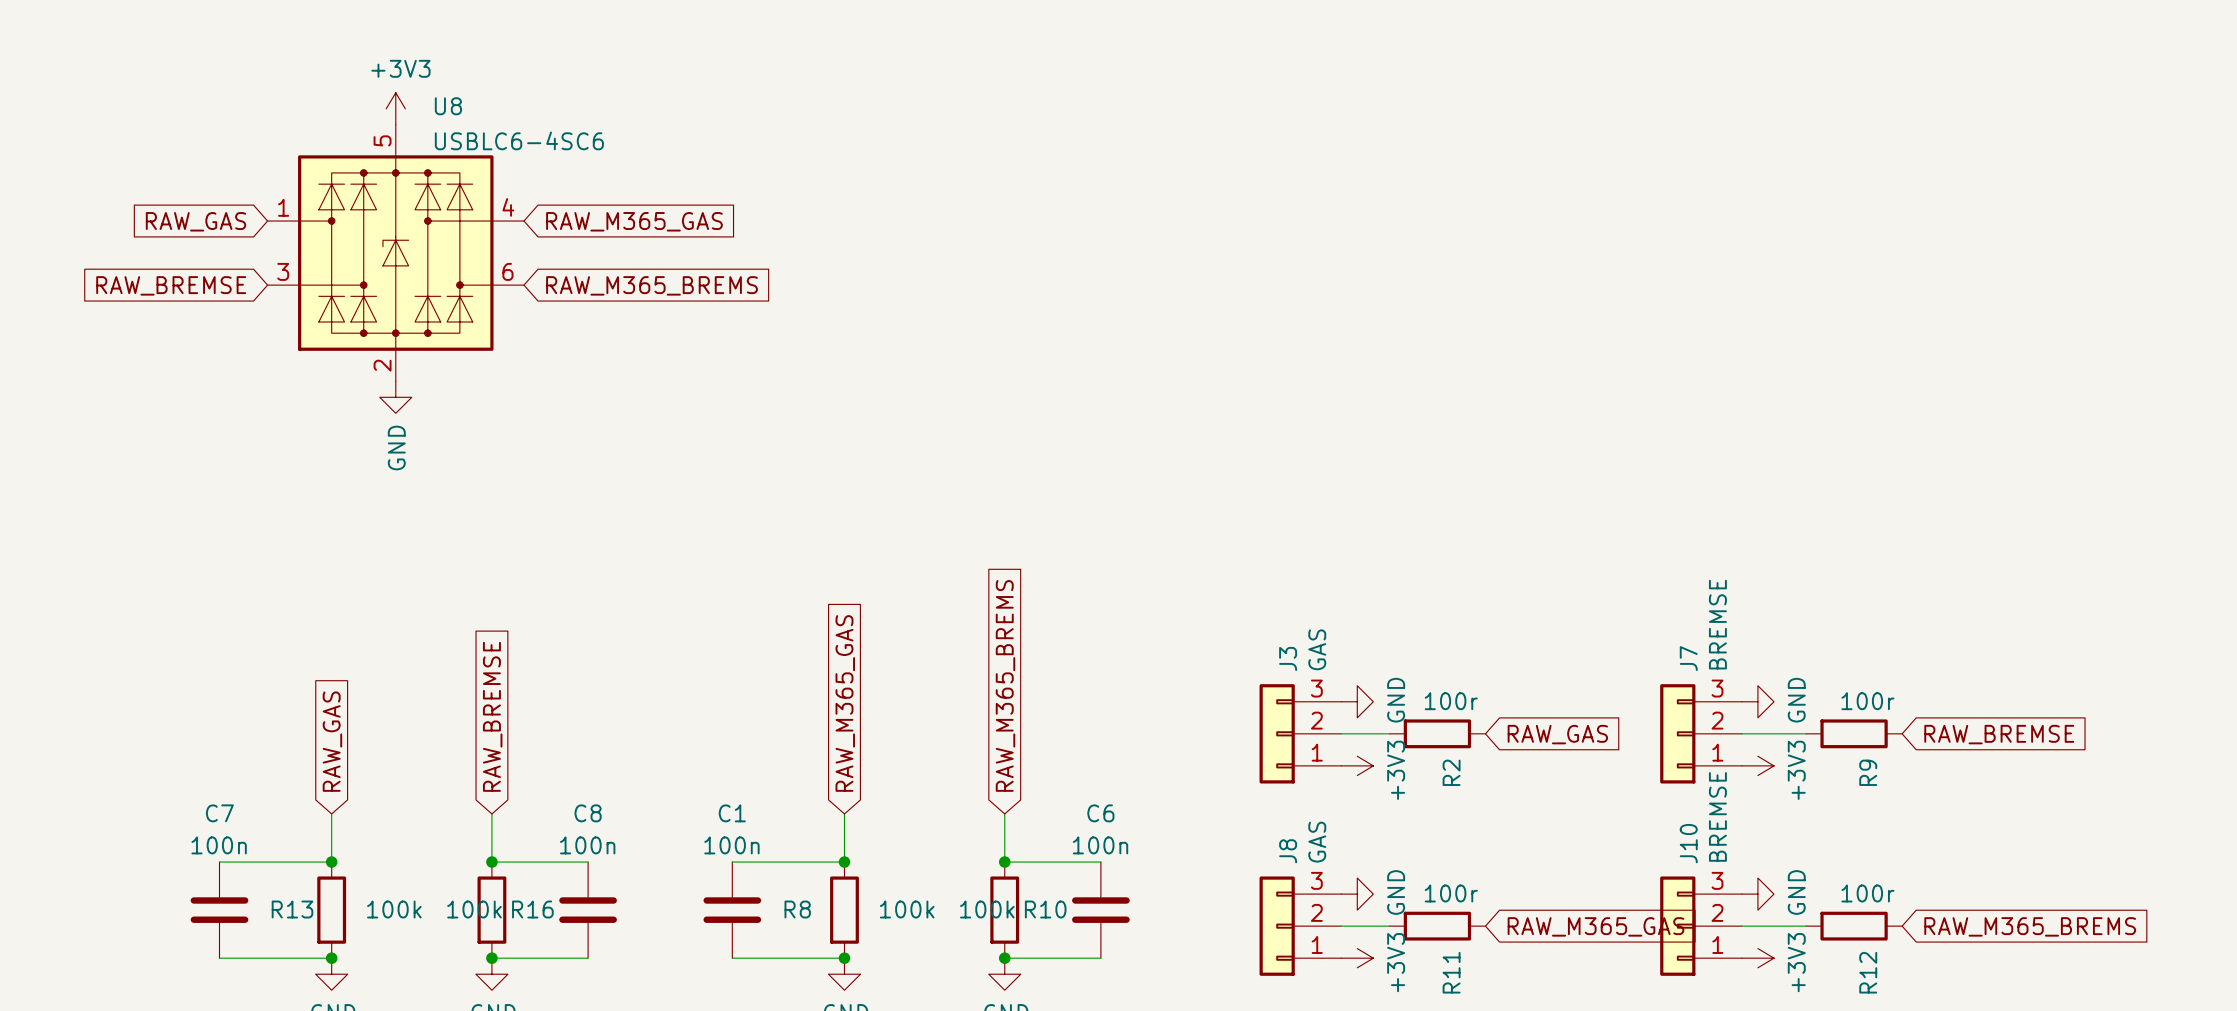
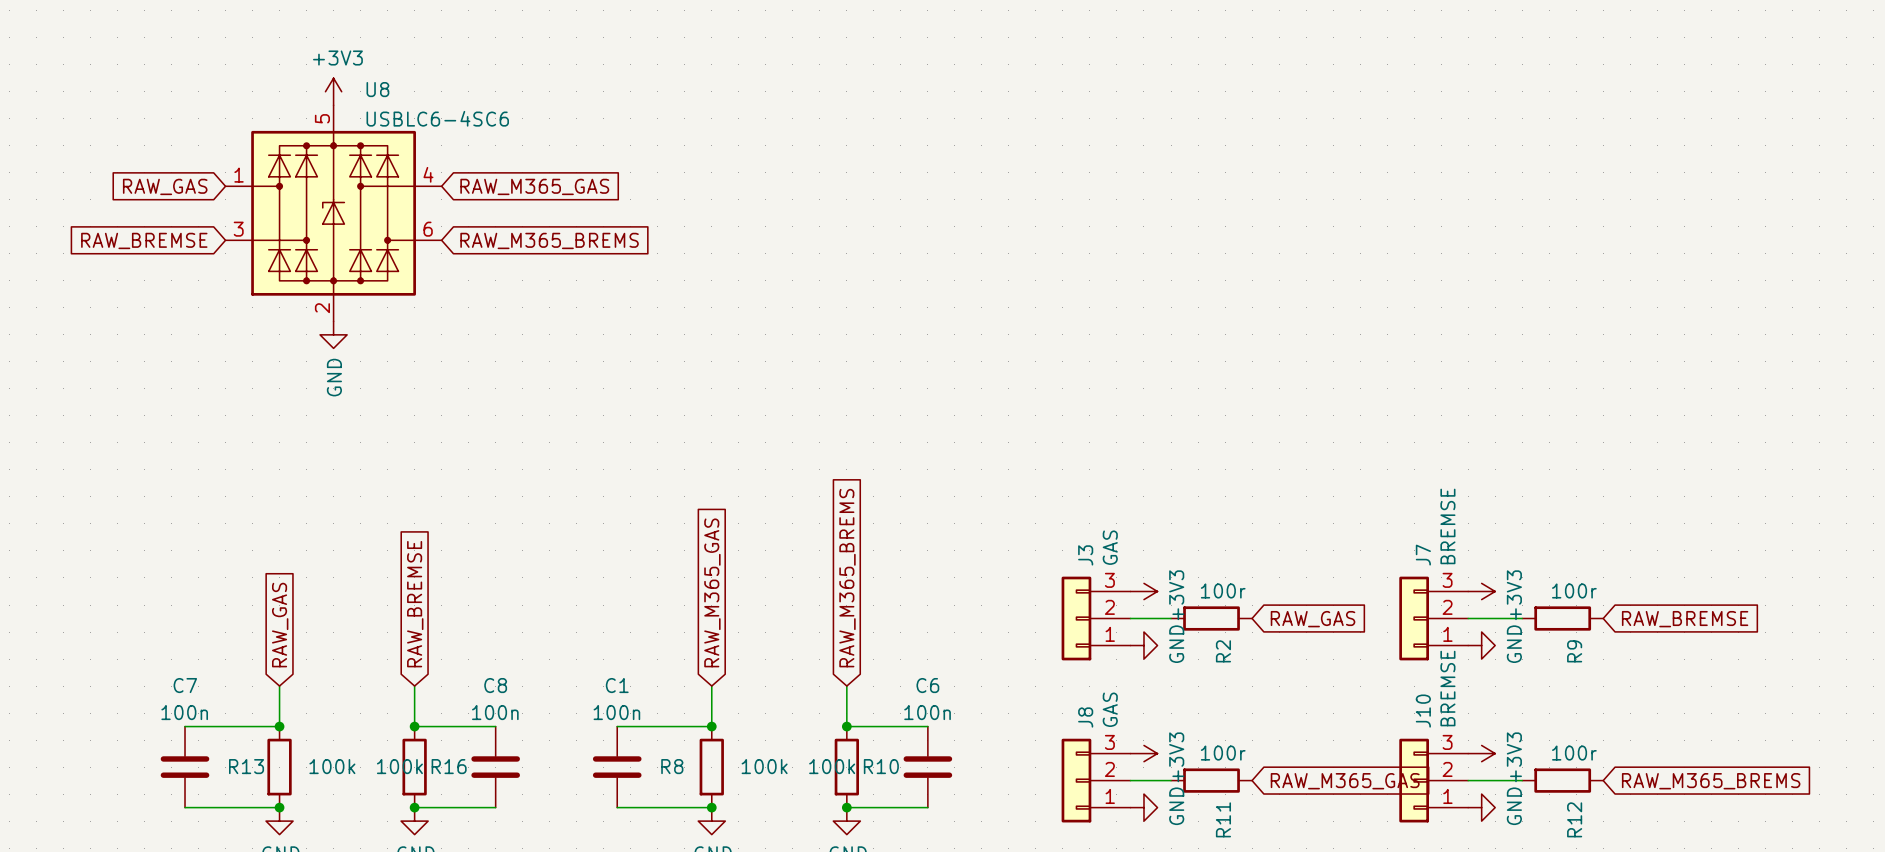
power symbol: GND (1357, 701) -> +3V3 (1143, 591)
power symbol: GND (1757, 701) -> +3V3 (1481, 591)
power symbol: +3V3 (1357, 765) -> GND (1143, 645)
power symbol: +3V3 (1757, 765) -> GND (1481, 645)
power symbol: GND (1357, 894) -> +3V3 (1143, 753)
power symbol: GND (1757, 894) -> +3V3 (1481, 753)
power symbol: +3V3 (1357, 958) -> GND (1143, 807)
power symbol: +3V3 (1757, 958) -> GND (1481, 807)

